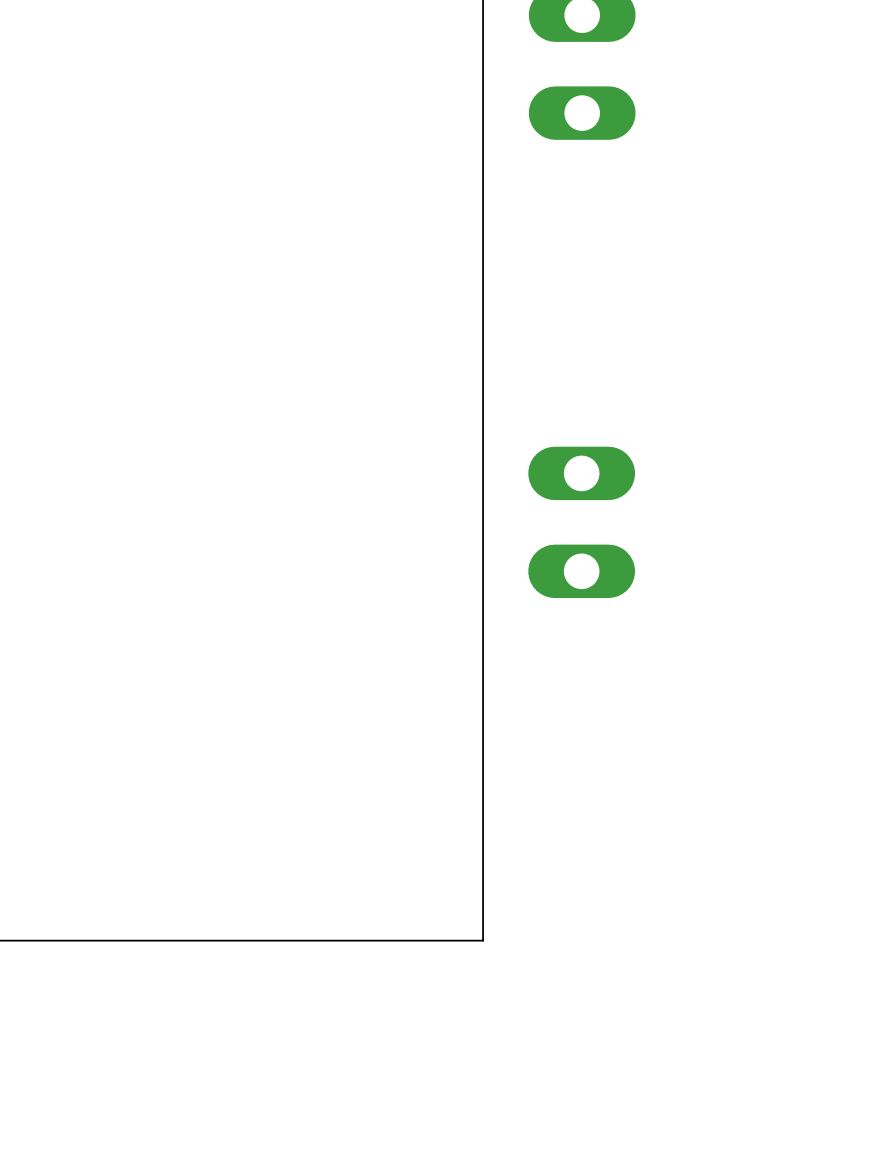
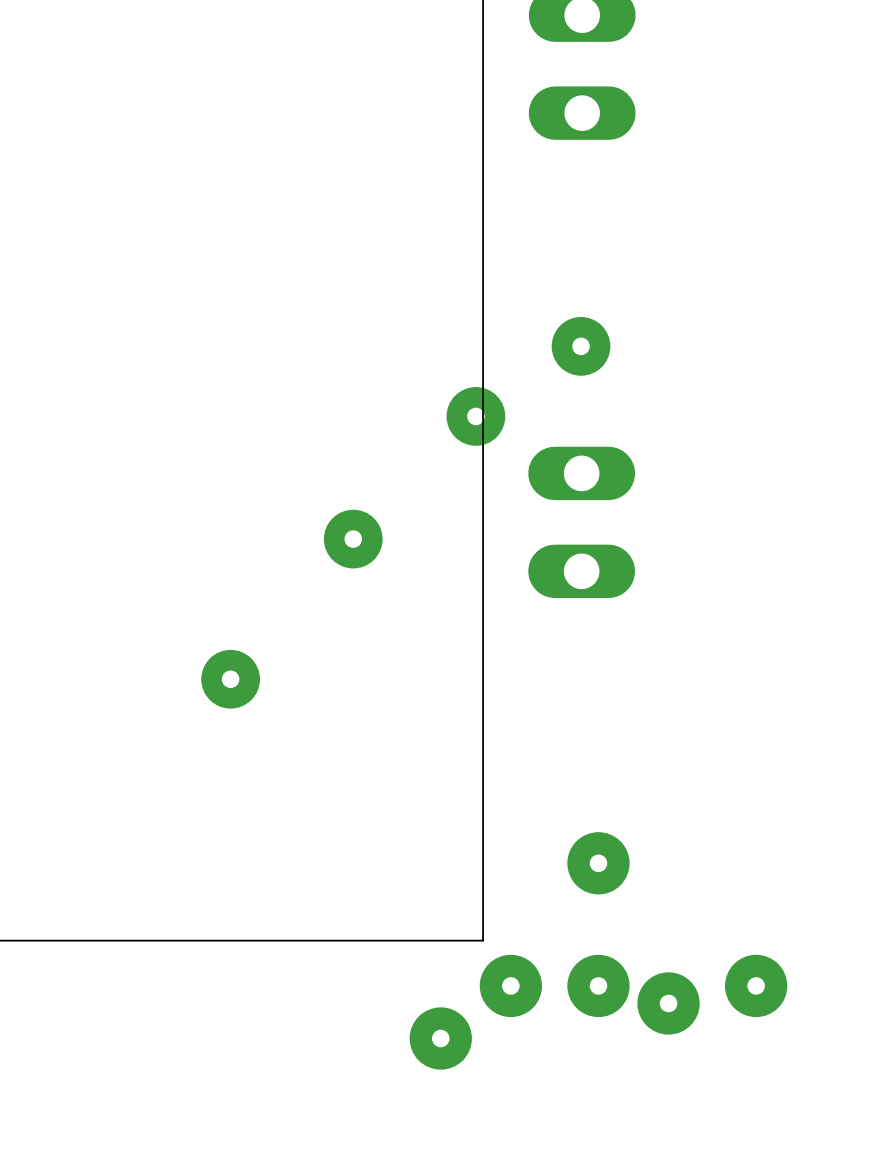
via: none -> (581, 346)
via: none -> (475, 416)
via: none -> (353, 539)
via: none -> (230, 679)
via: none -> (598, 863)
via: none -> (510, 985)
via: none -> (598, 985)
via: none -> (756, 985)
via: none -> (668, 1003)
via: none -> (440, 1038)

